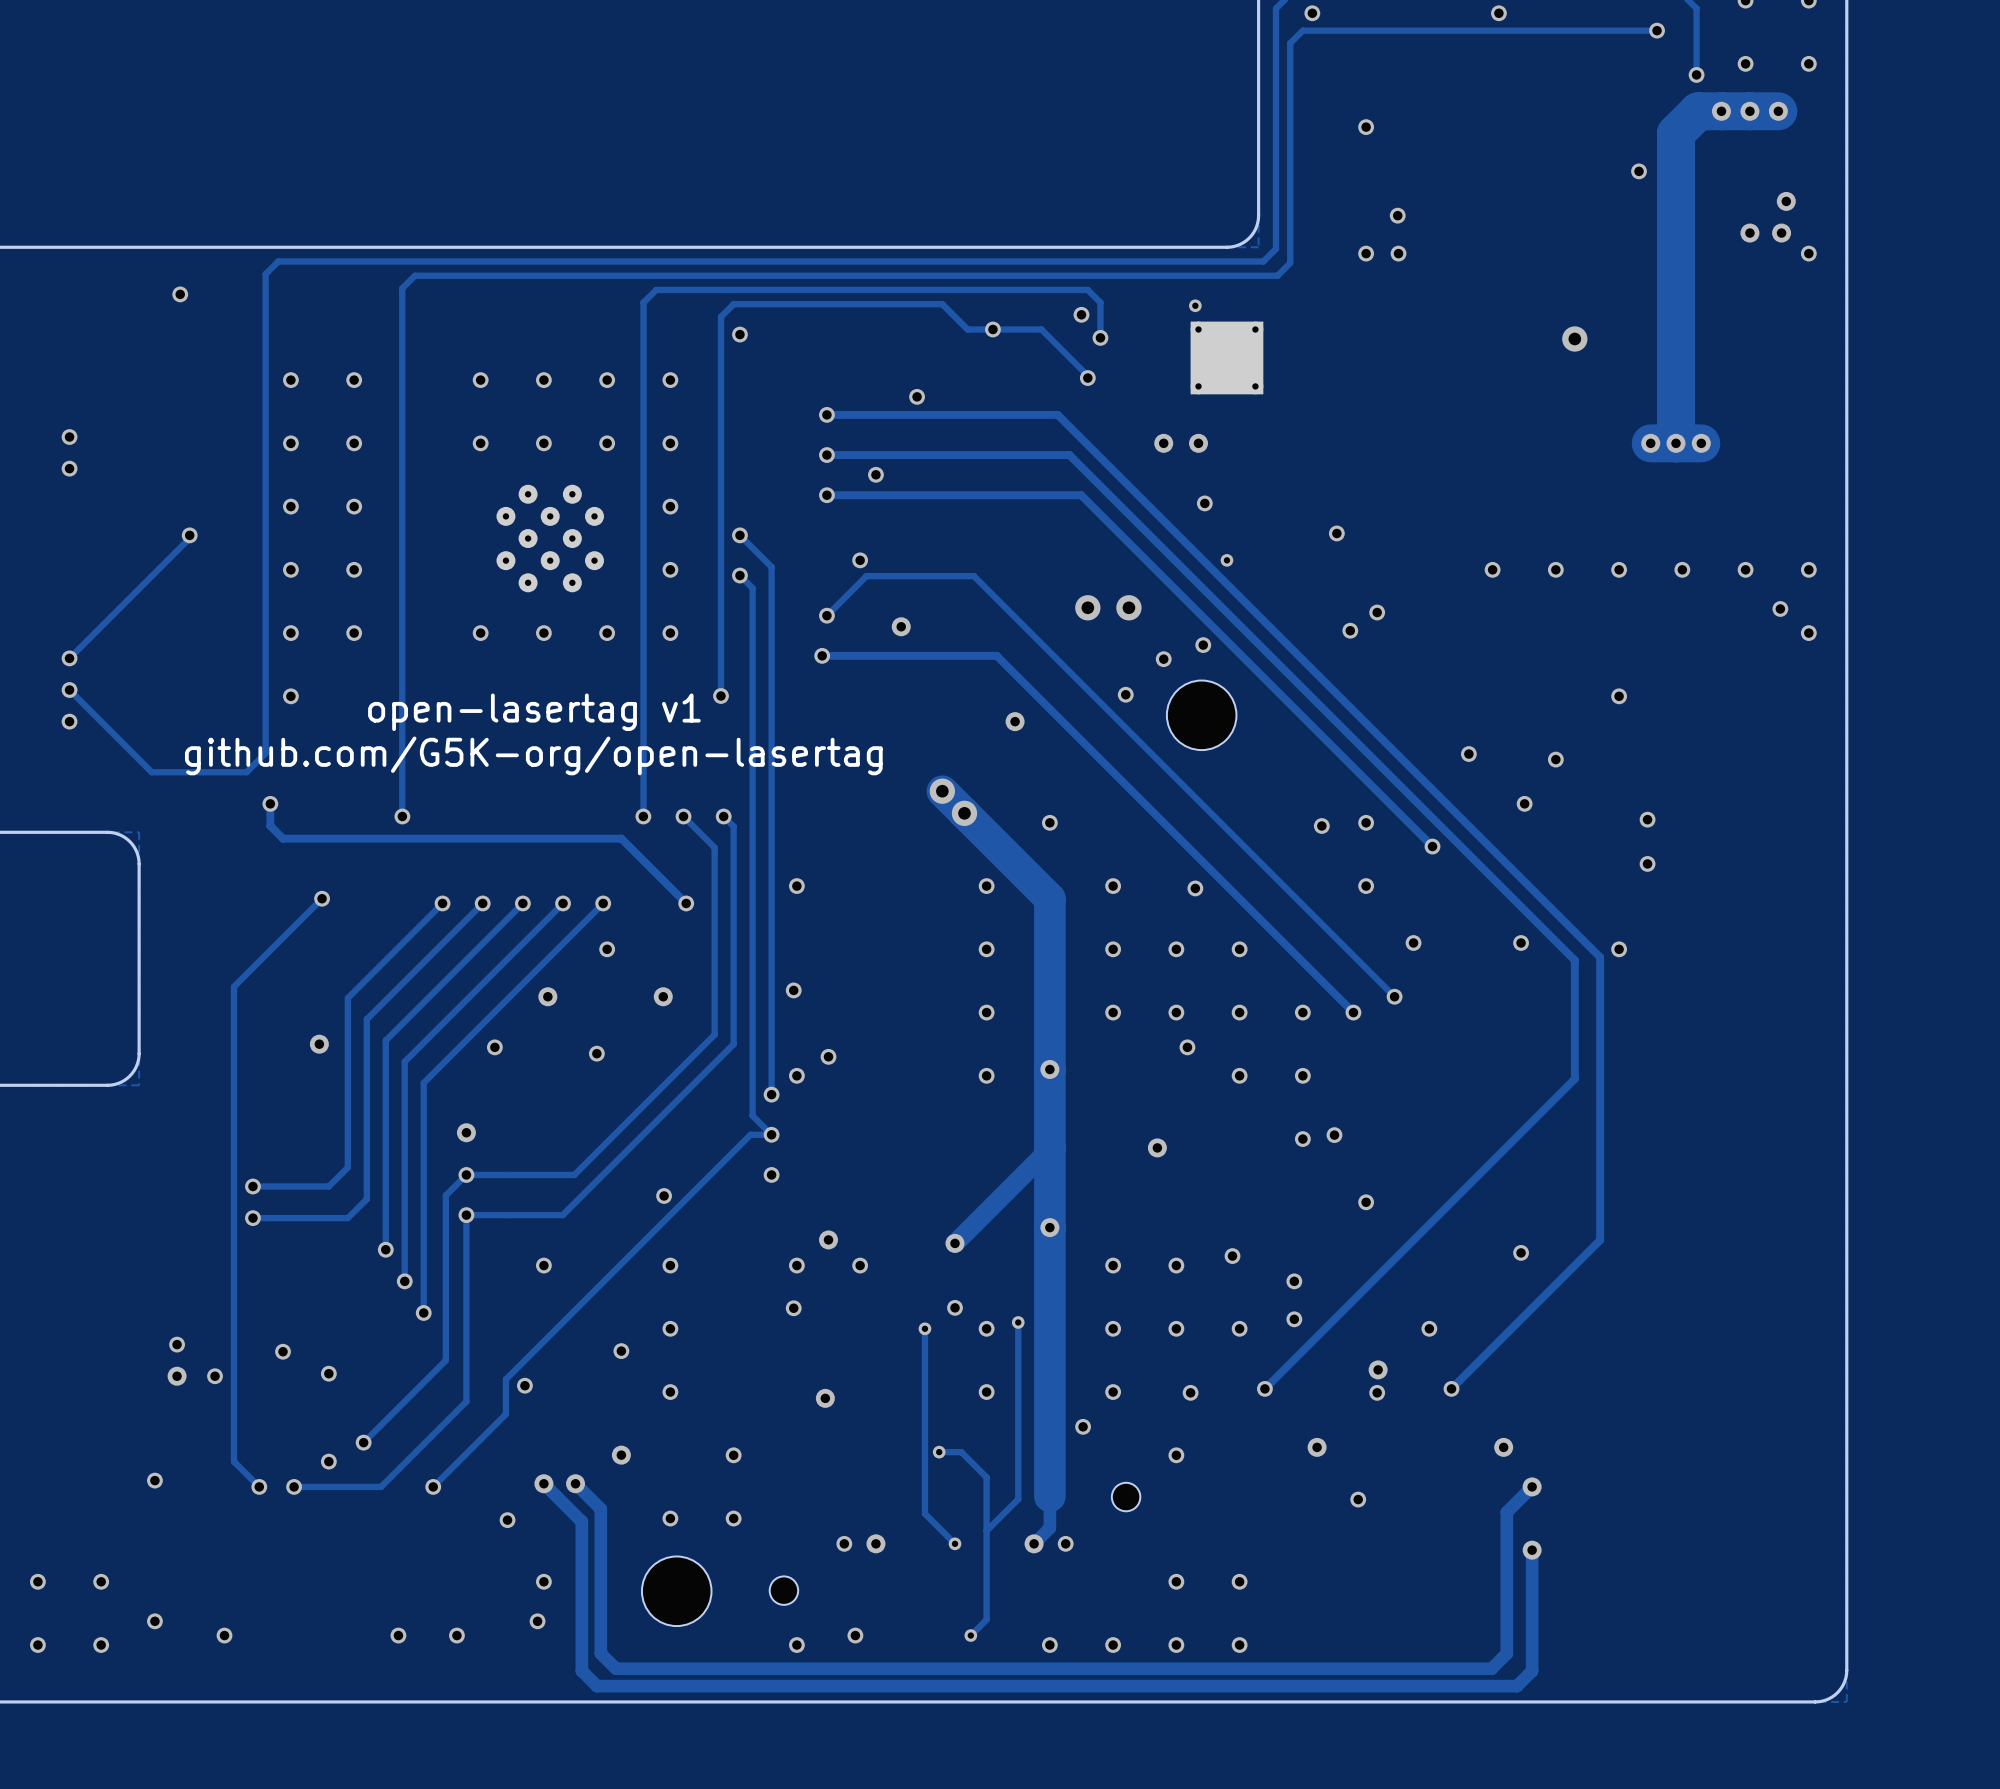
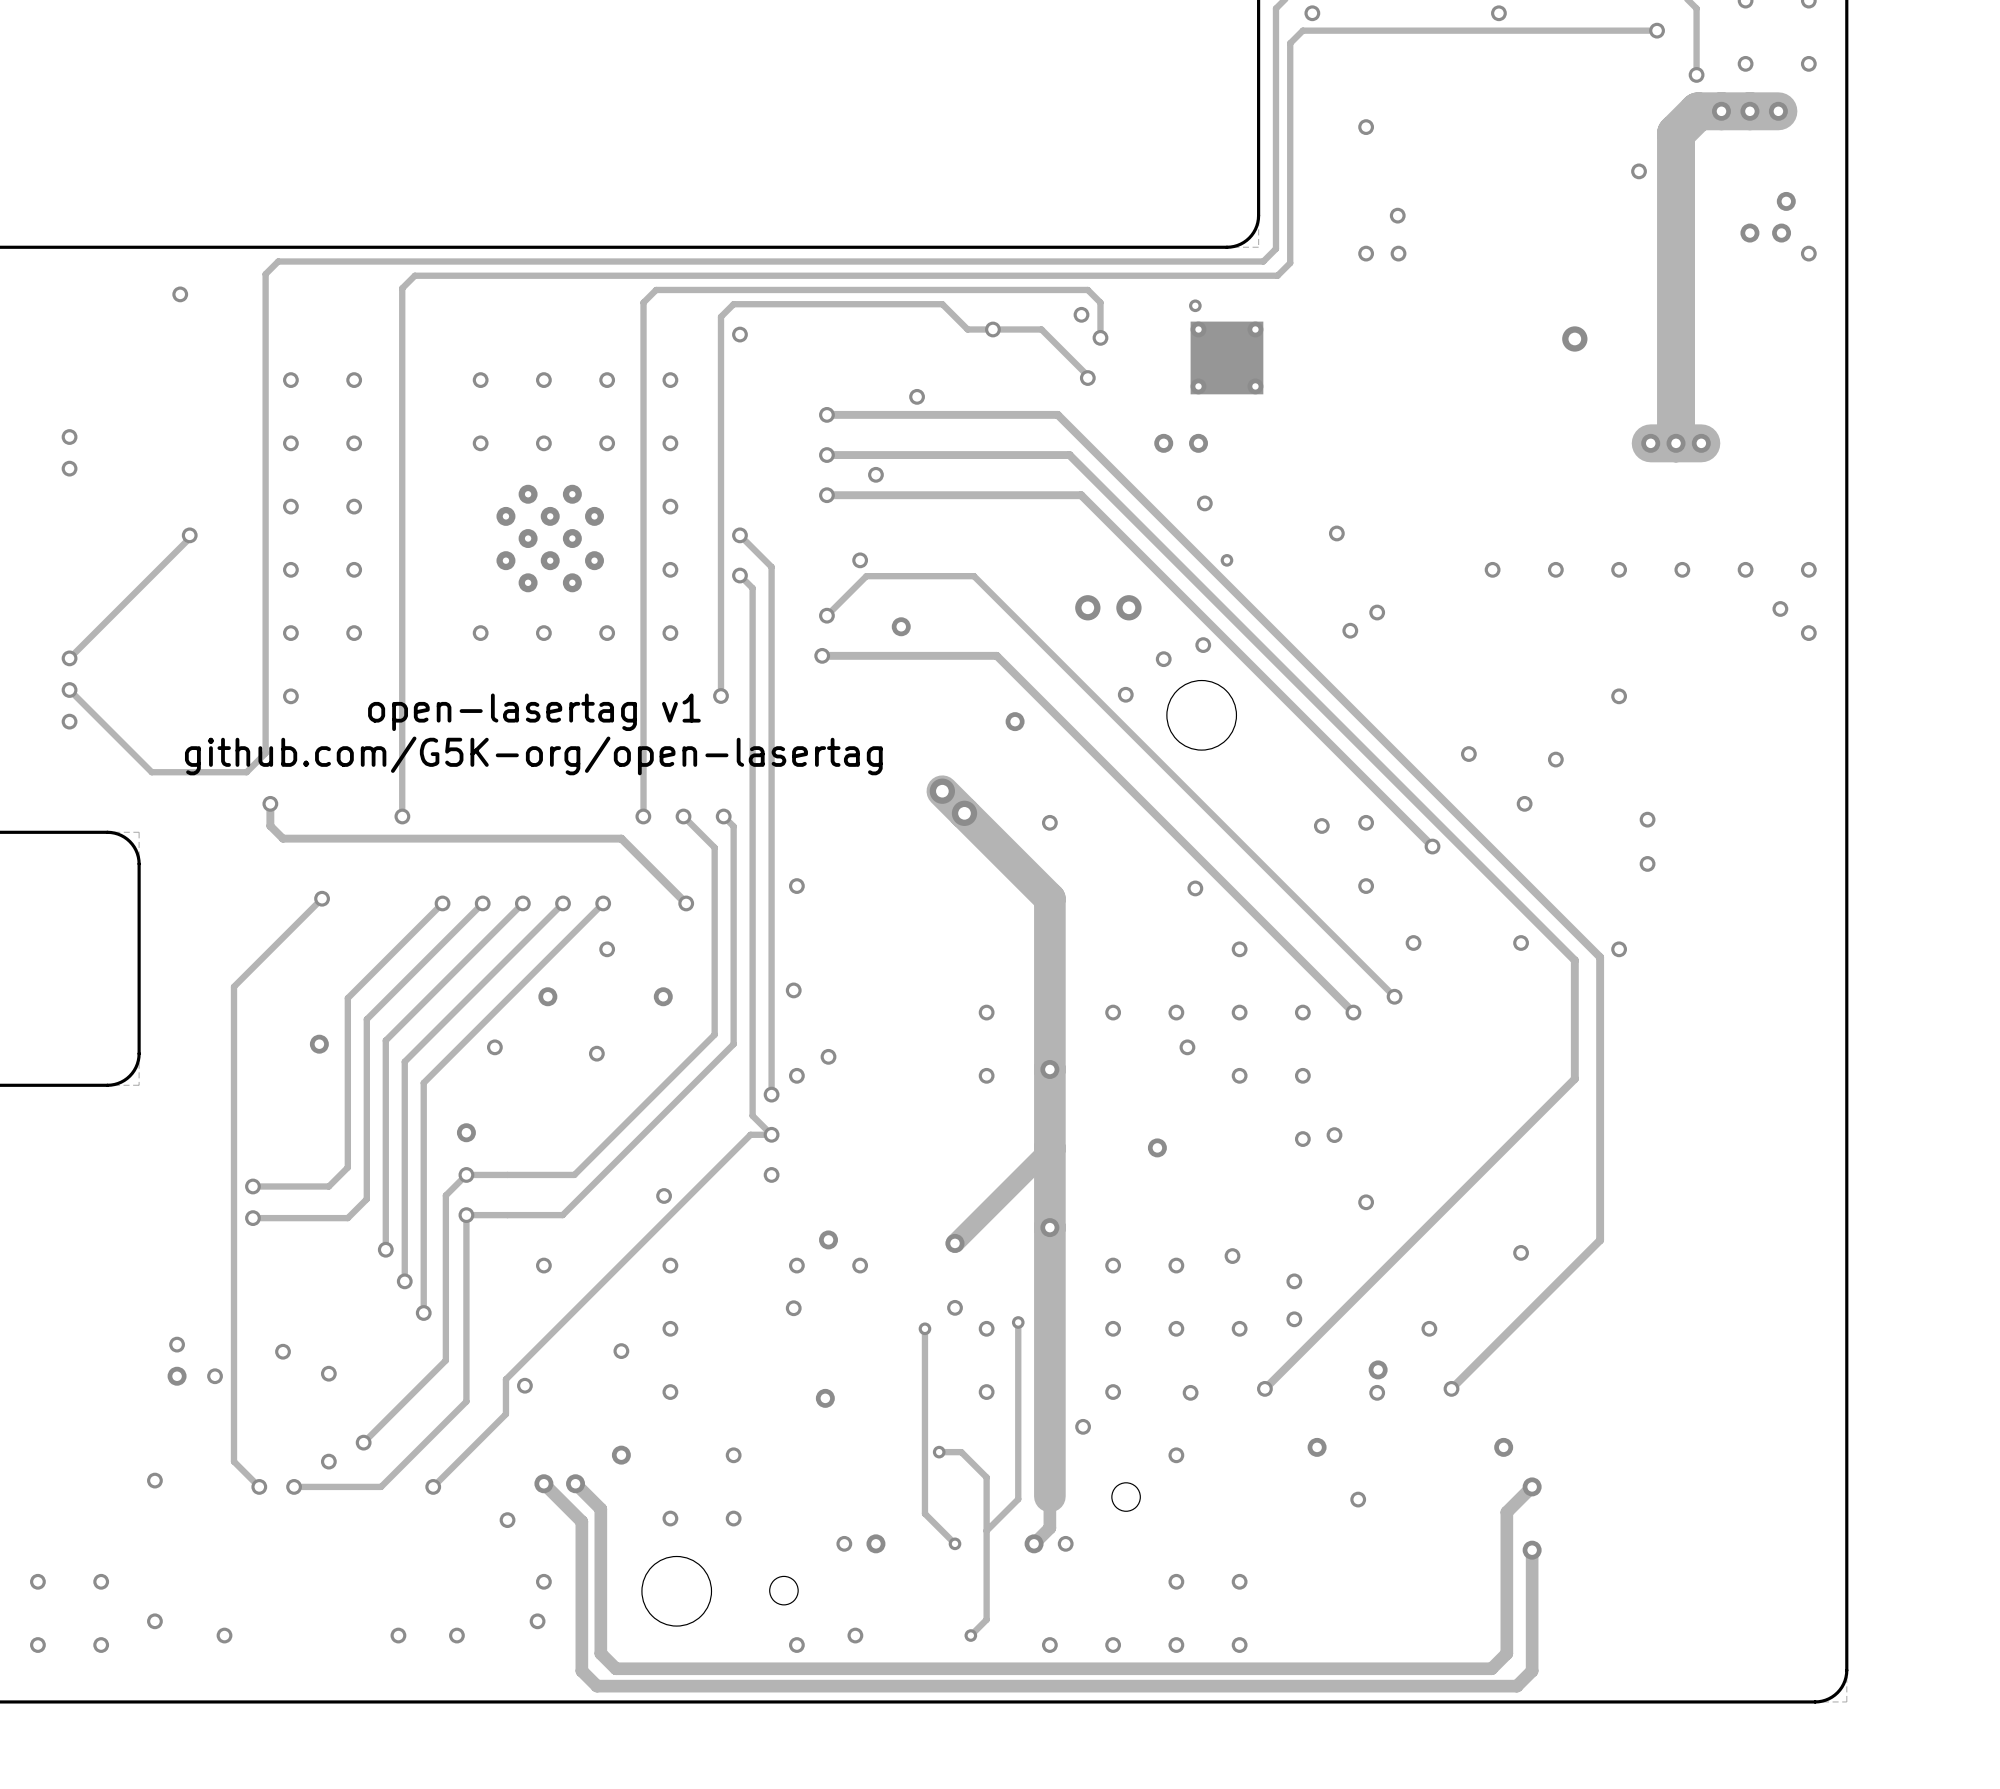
via: (986, 886) -> none
via: (1113, 886) -> none
via: (986, 949) -> none
via: (1113, 949) -> none
via: (1176, 949) -> none

